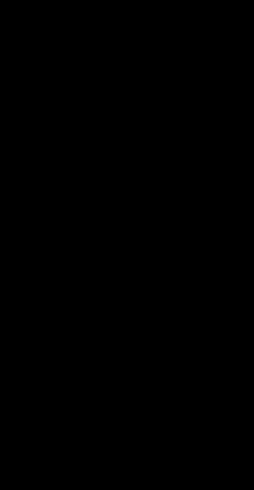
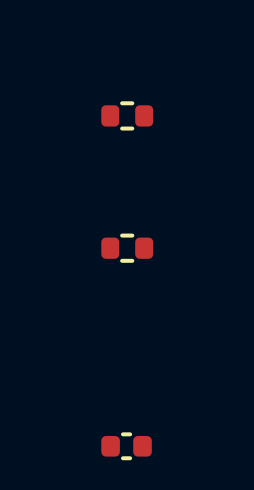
part: none -> (127, 115)
part: none -> (127, 248)
part: none -> (126, 446)

